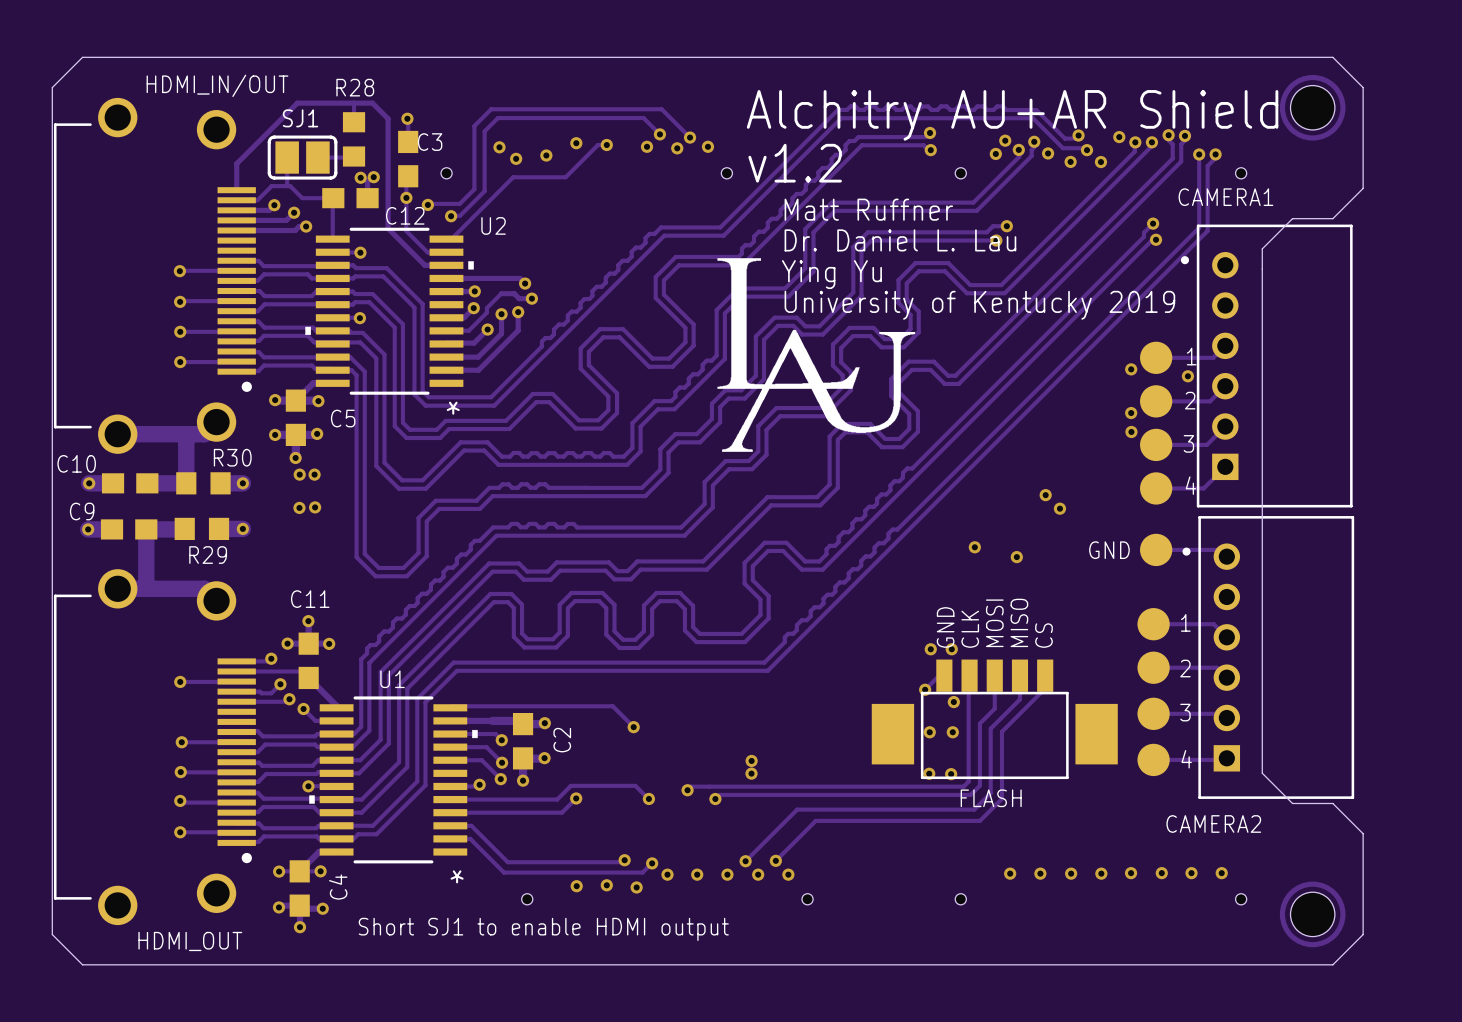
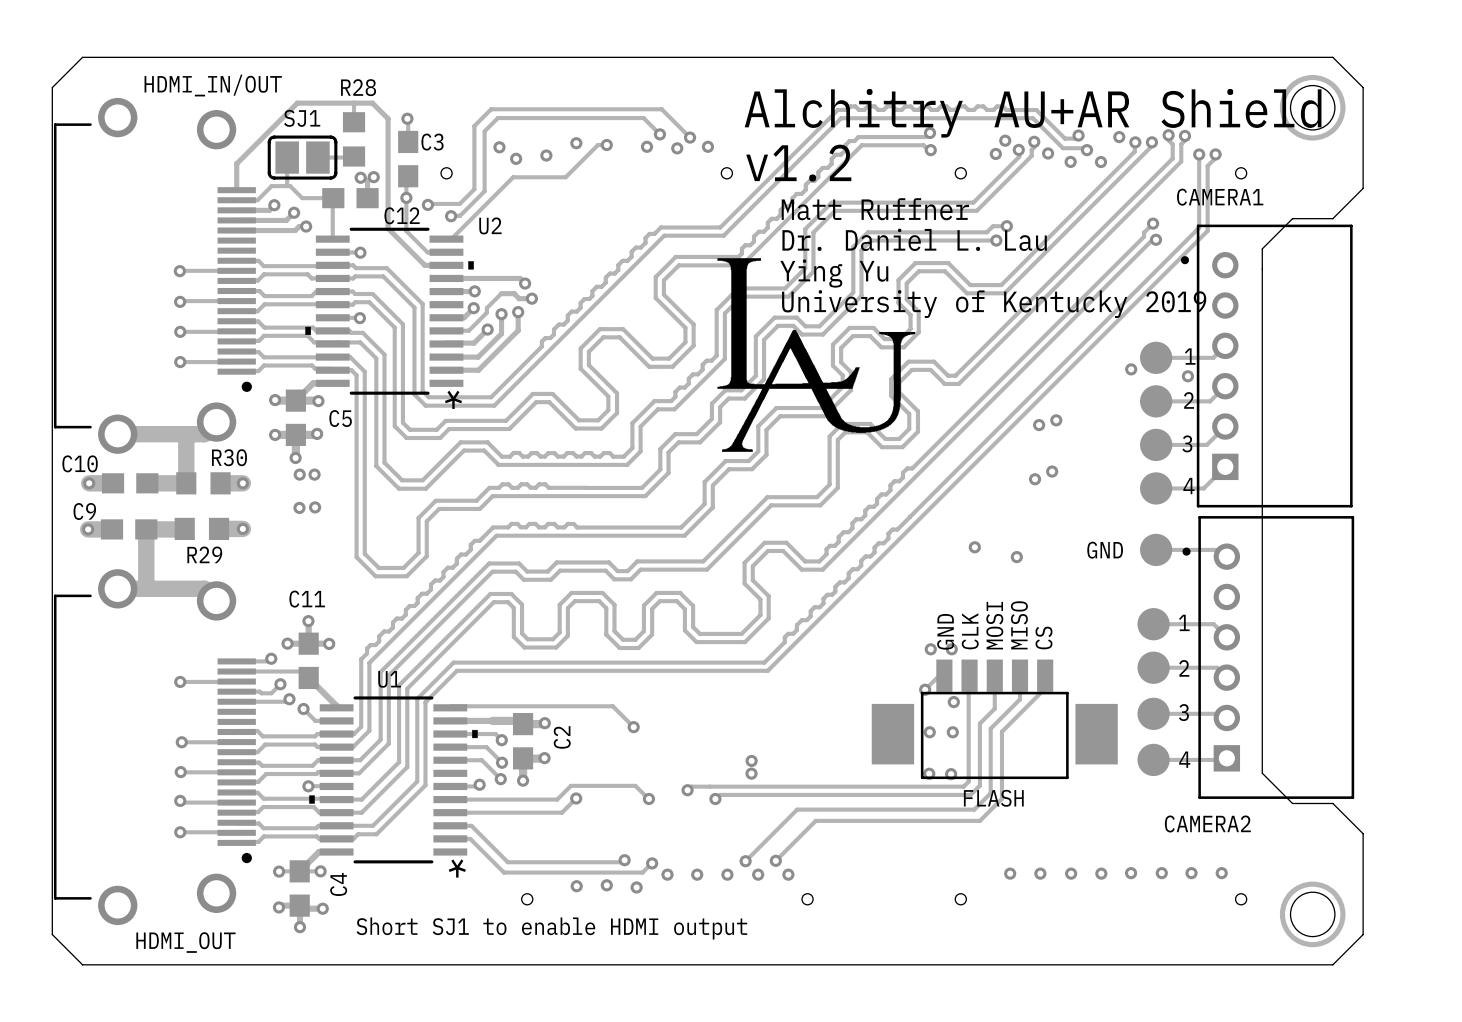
via: (1131, 413) -> none
via: none -> (1056, 420)
via: none -> (1039, 425)
via: (1131, 431) -> none
via: none -> (1052, 471)
via: none -> (1035, 479)
via: (1045, 495) -> none
via: (1059, 508) -> none

